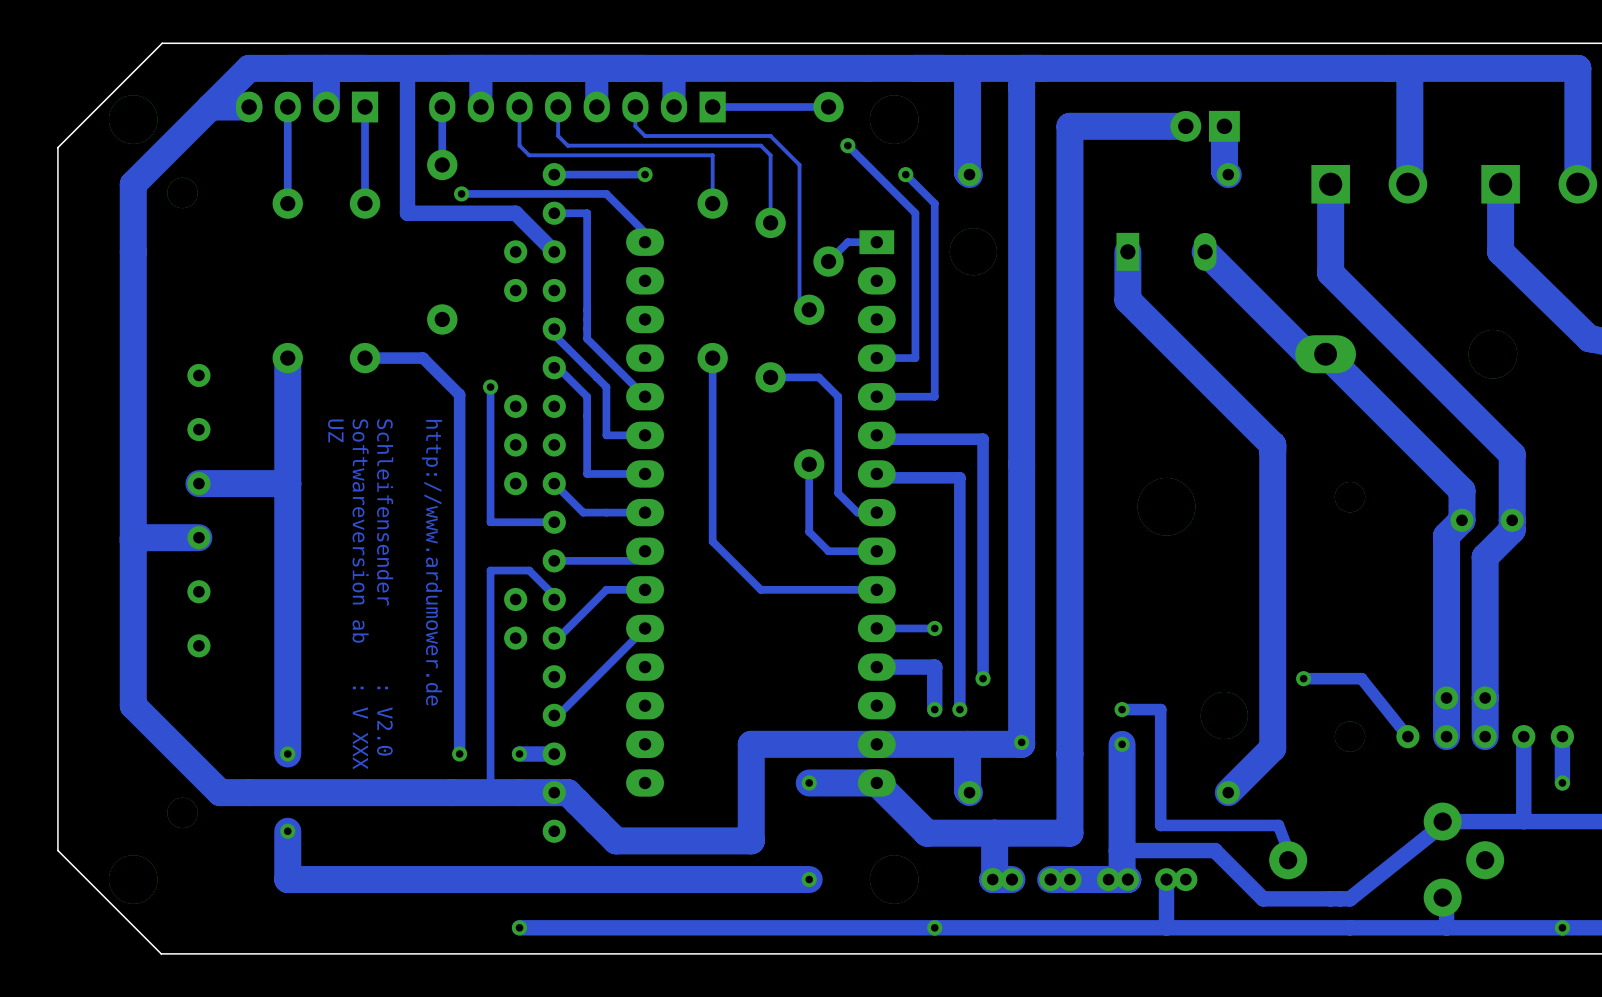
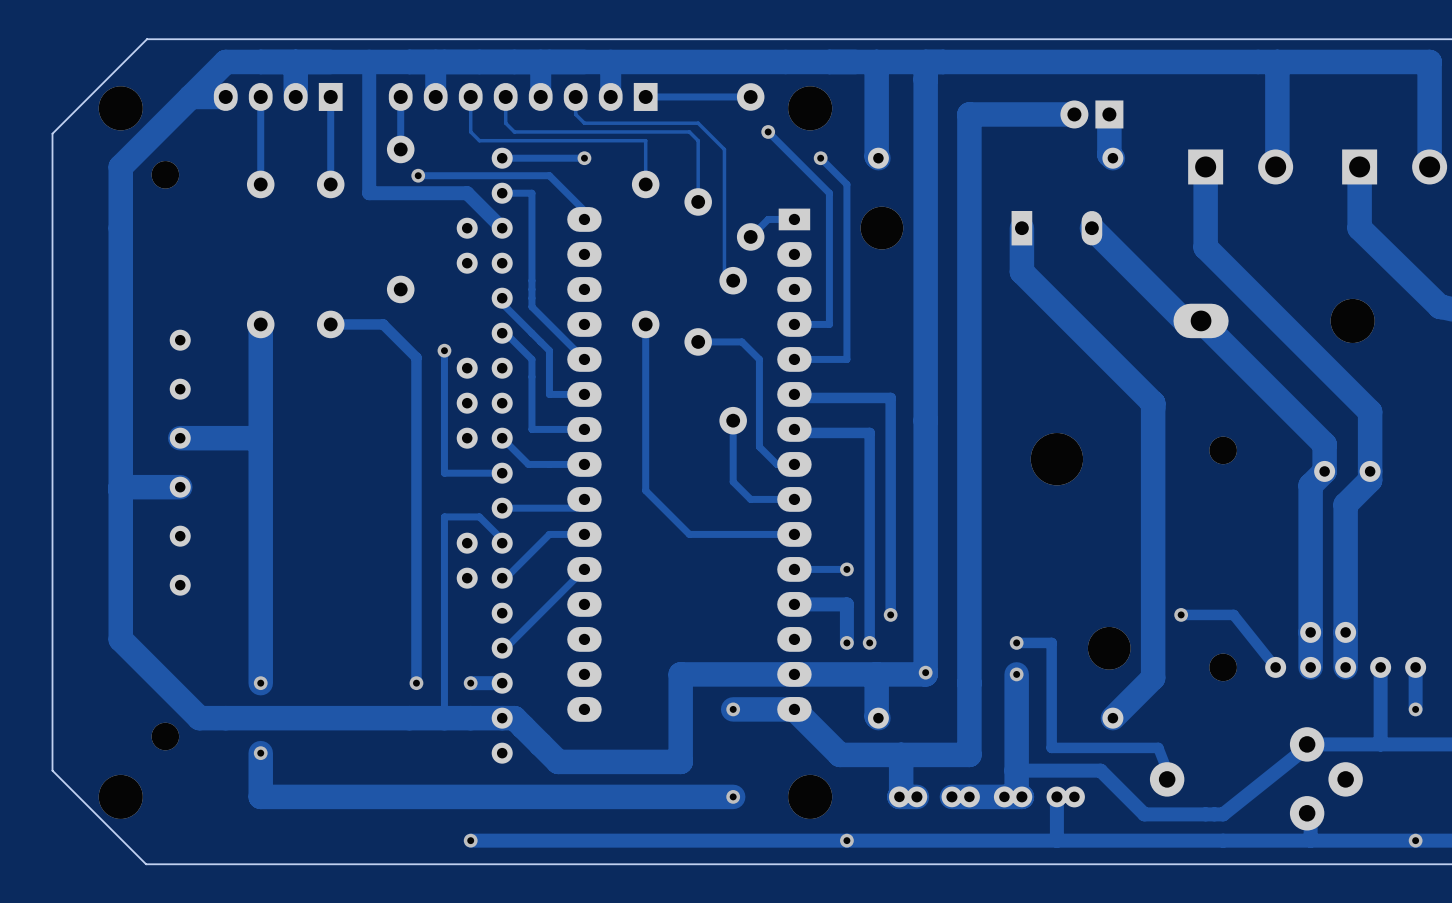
text: UZ (335, 430) -> none
text: http://www.ardumower.de (432, 562) -> none
text: Schleifensender : V2.0 (385, 587) -> none
text: Softwareversion ab : V XXX (360, 594) -> none

